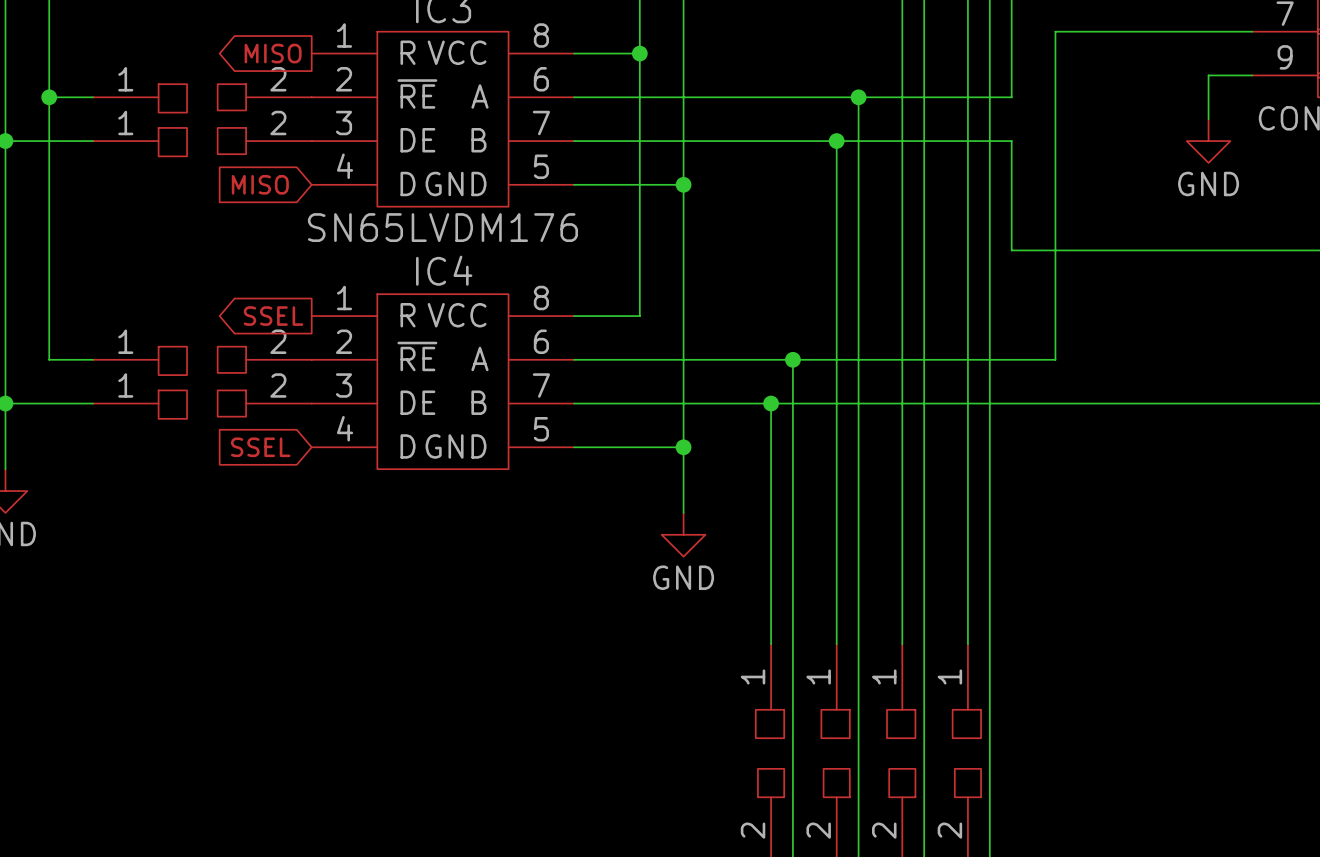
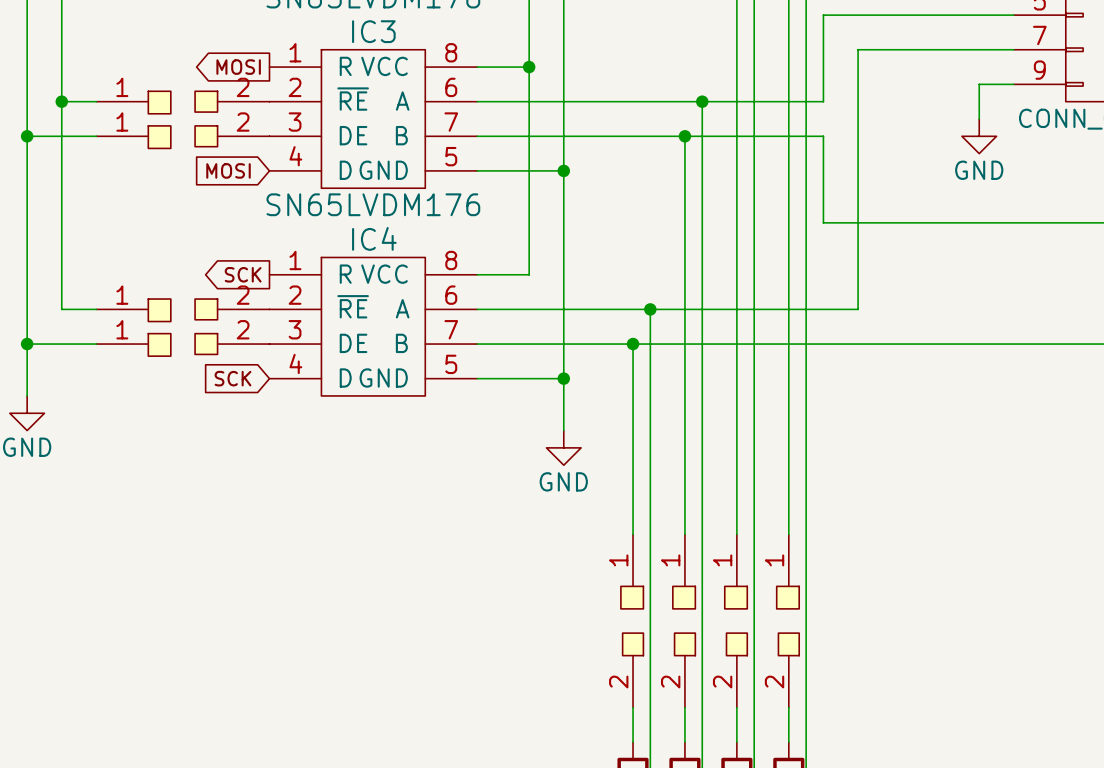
global label: MISO (273, 53) -> MOSI (238, 67)
global label: MISO (260, 184) -> MOSI (228, 170)
global label: SSEL (273, 316) -> SCK (243, 274)
global label: SSEL (260, 447) -> SCK (233, 378)

